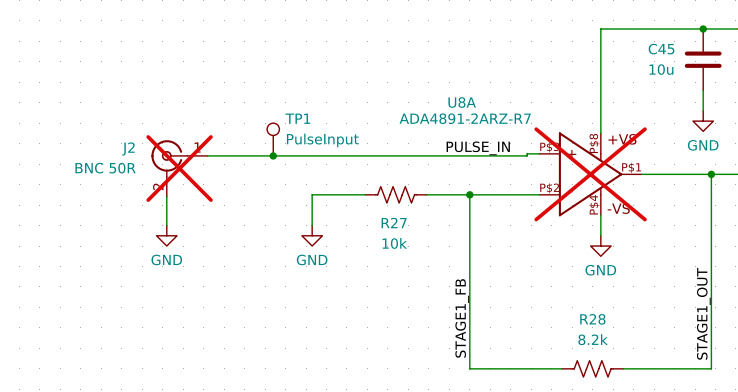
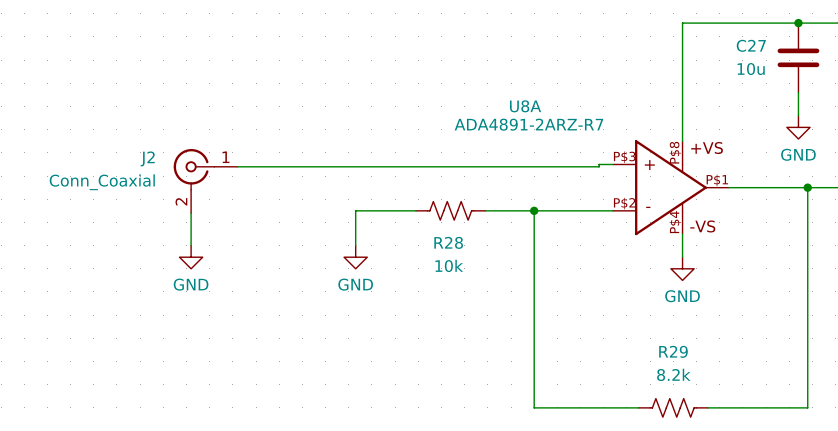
C45 name: C45 (661, 49) -> C27 (751, 45)
TP1: PulseInput (273, 139) -> none
label: PULSE_IN (478, 148) -> none
junction: (273, 155) -> none
J2 value: BNC 50R (105, 168) -> Conn_Coaxial (102, 182)
J2 do-not-place cross: (179, 168) -> none
U8A do-not-place cross: (590, 174) -> none
R27 name: R27 (394, 223) -> R28 (448, 242)
label: STAGE1_OUT (703, 313) -> none
label: STAGE1_FB (462, 318) -> none
R28 name: R28 (592, 319) -> R29 (673, 351)

